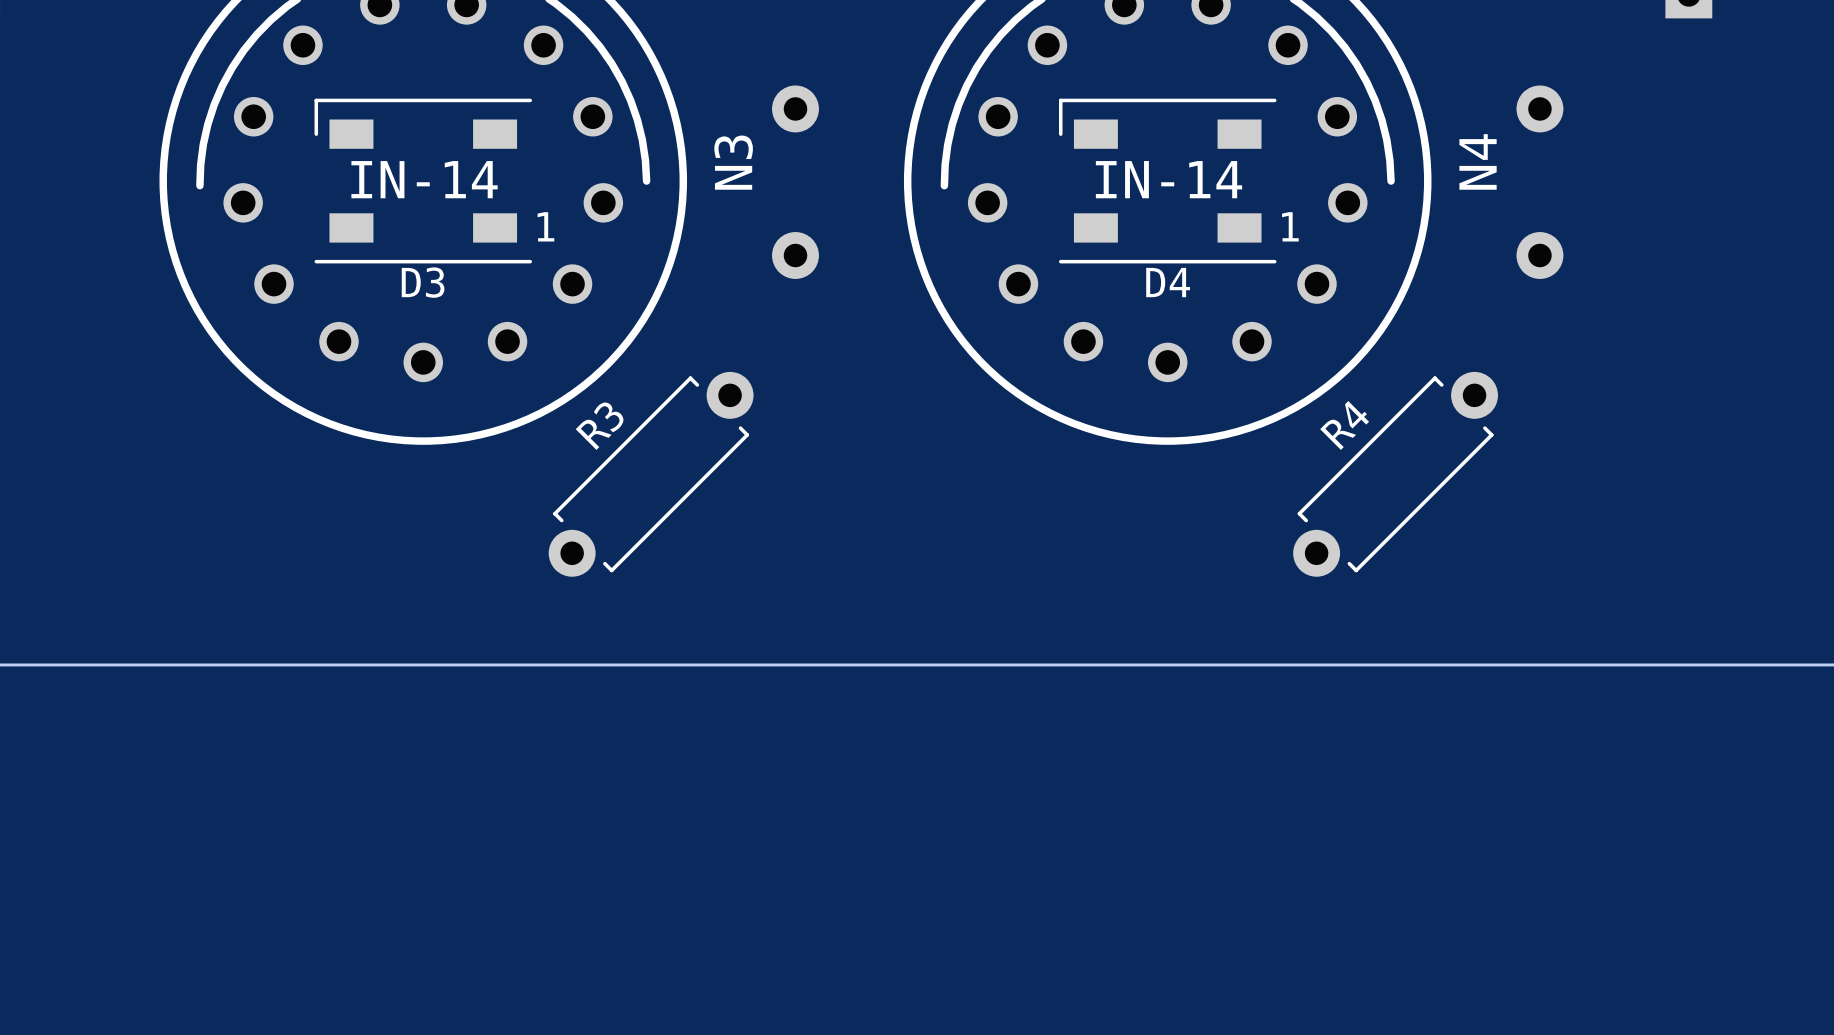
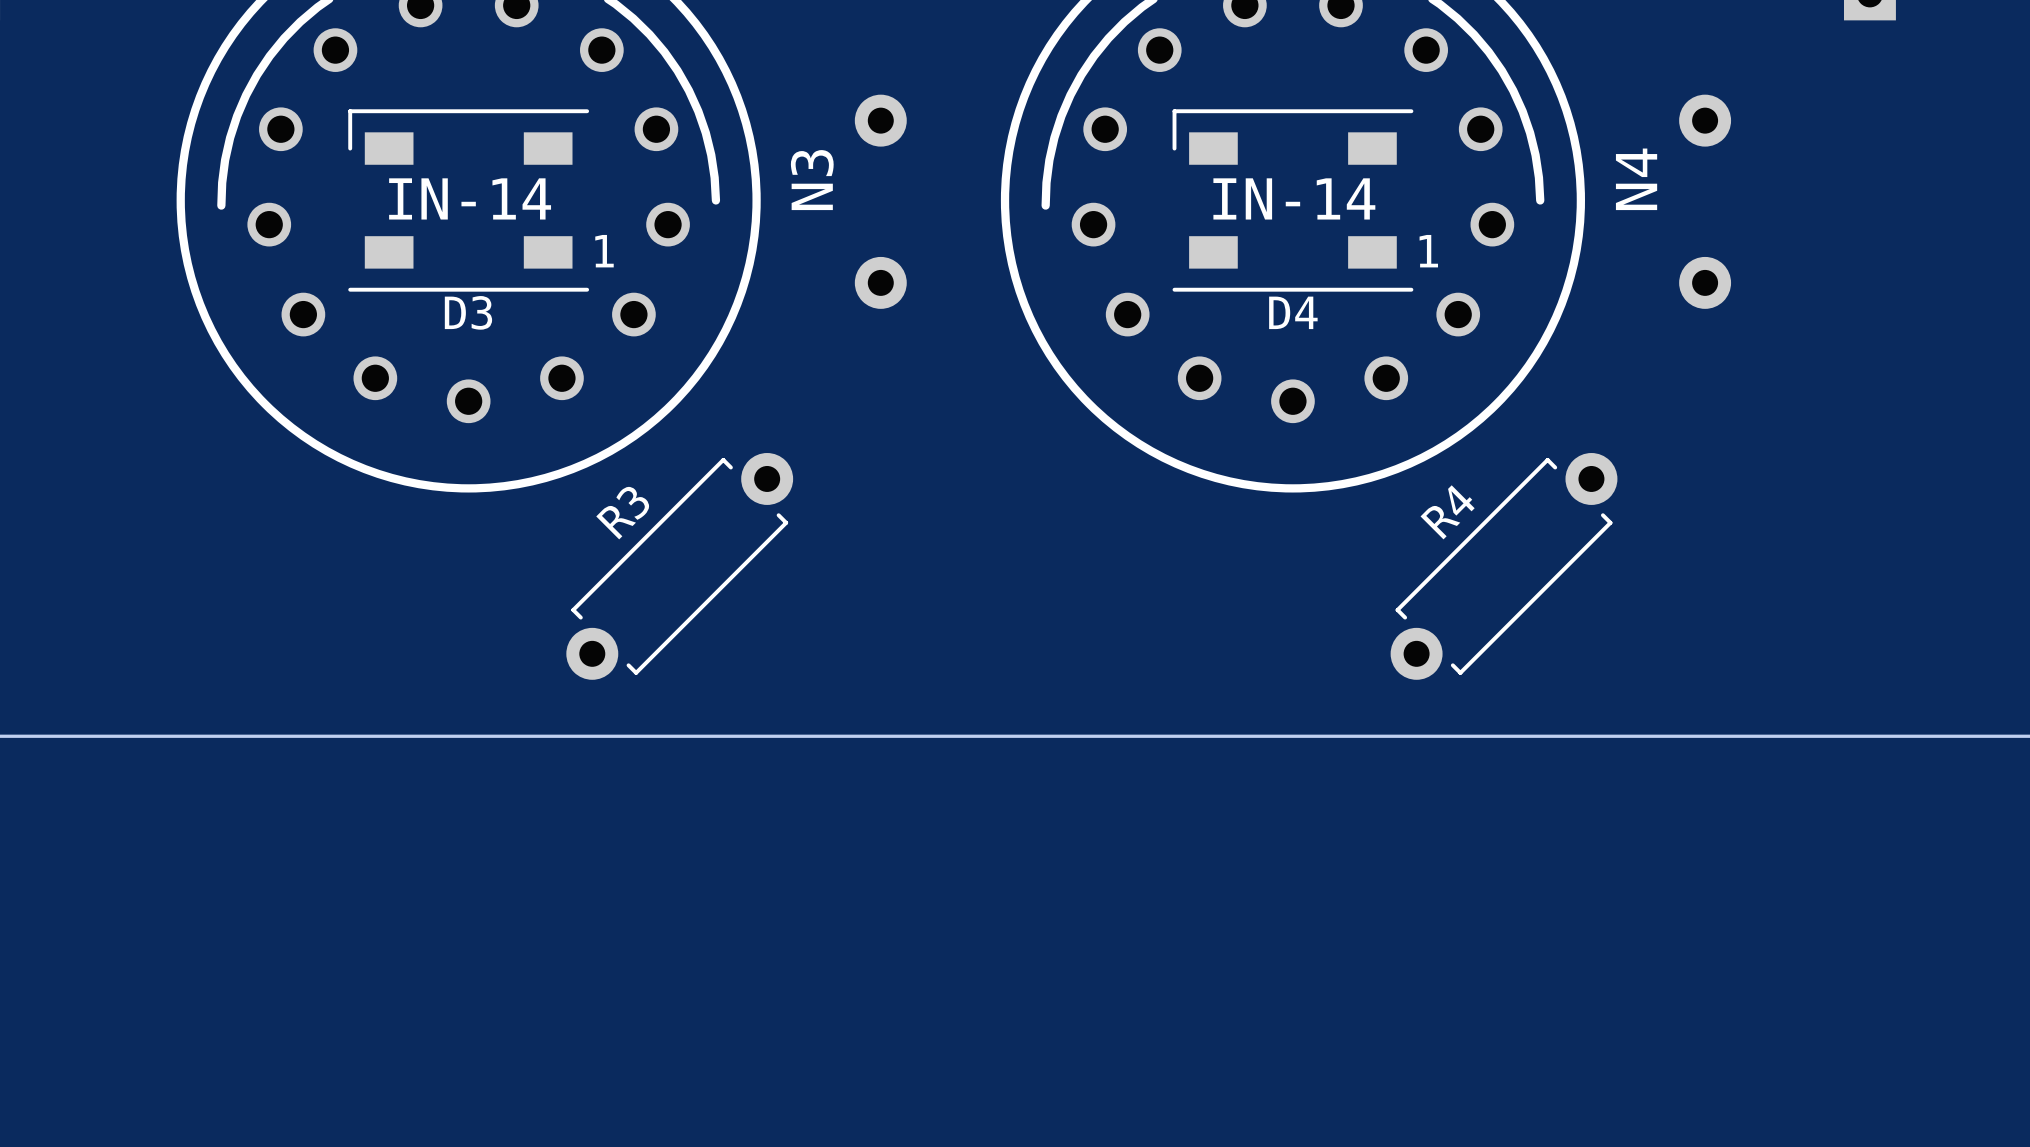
R3 position: (651, 474) -> (679, 566)
R4 position: (1395, 474) -> (1504, 566)

